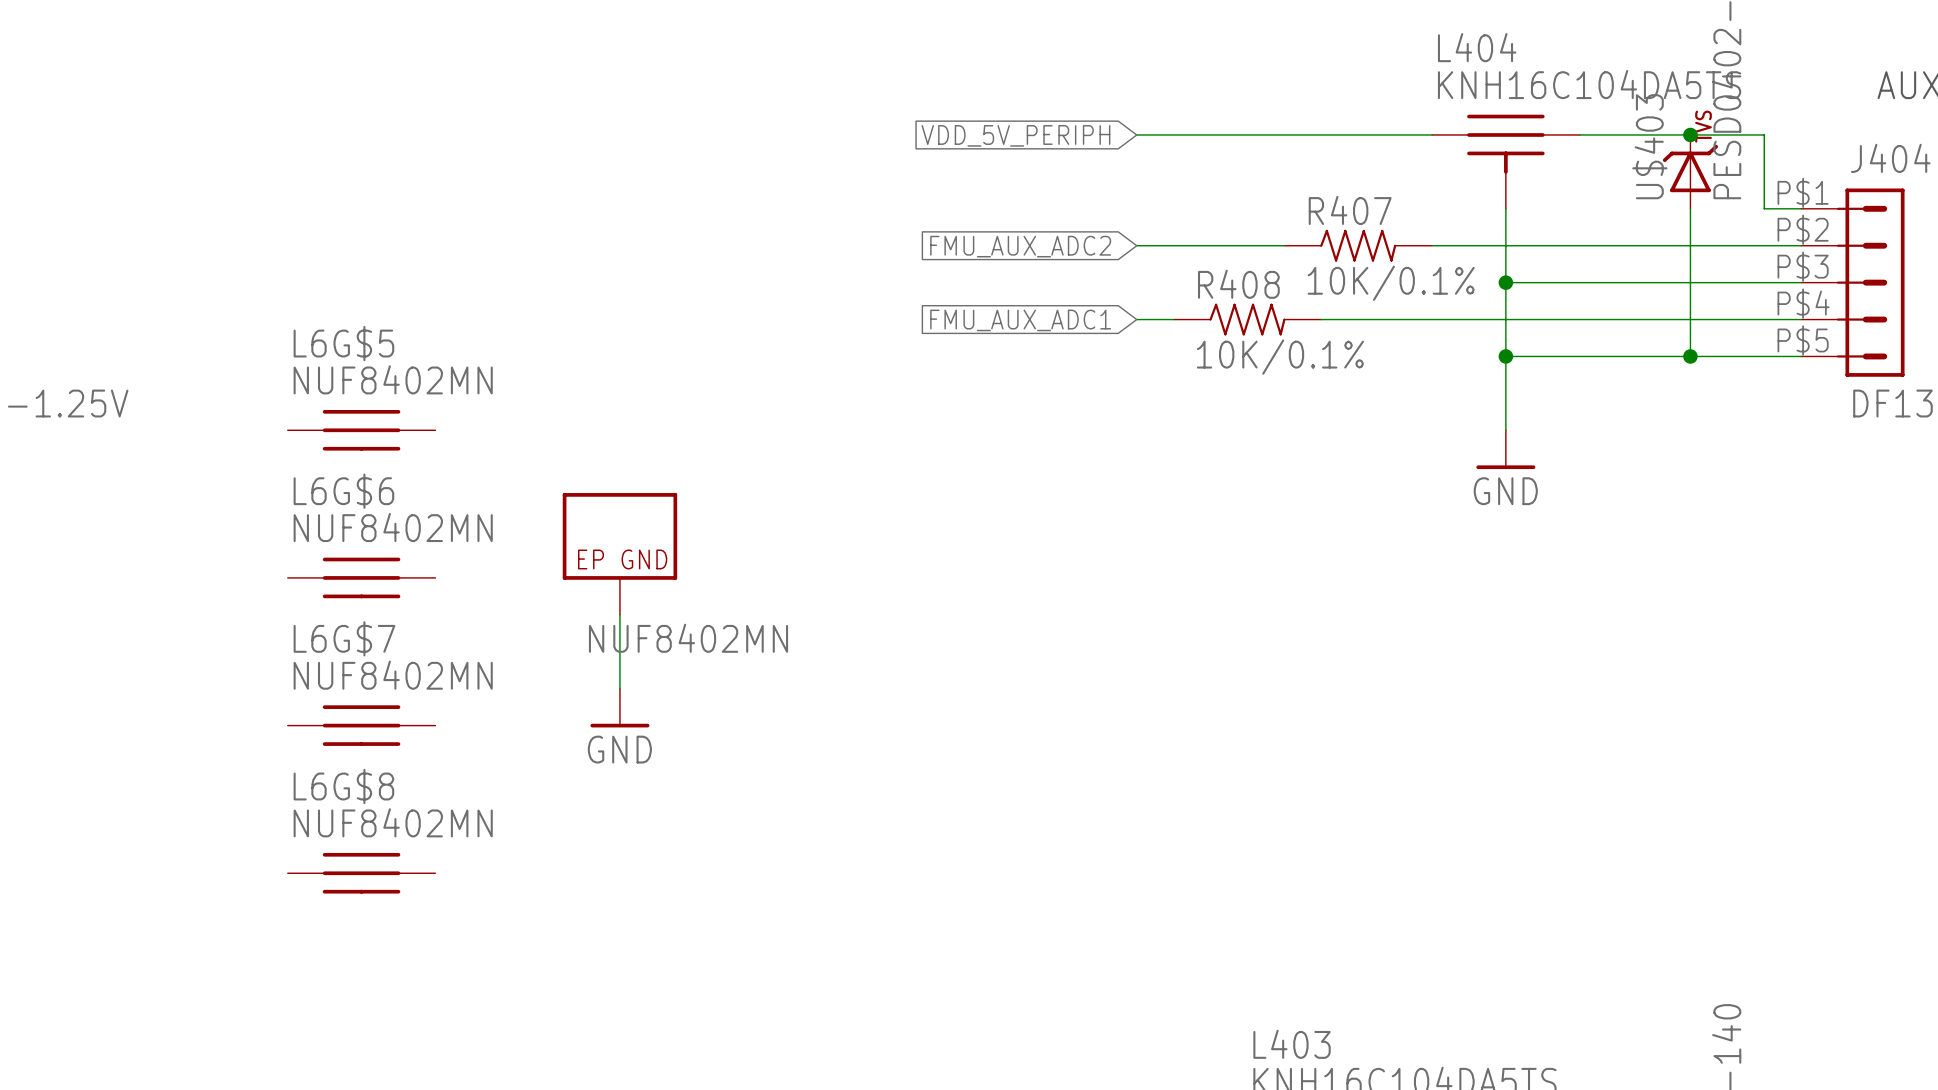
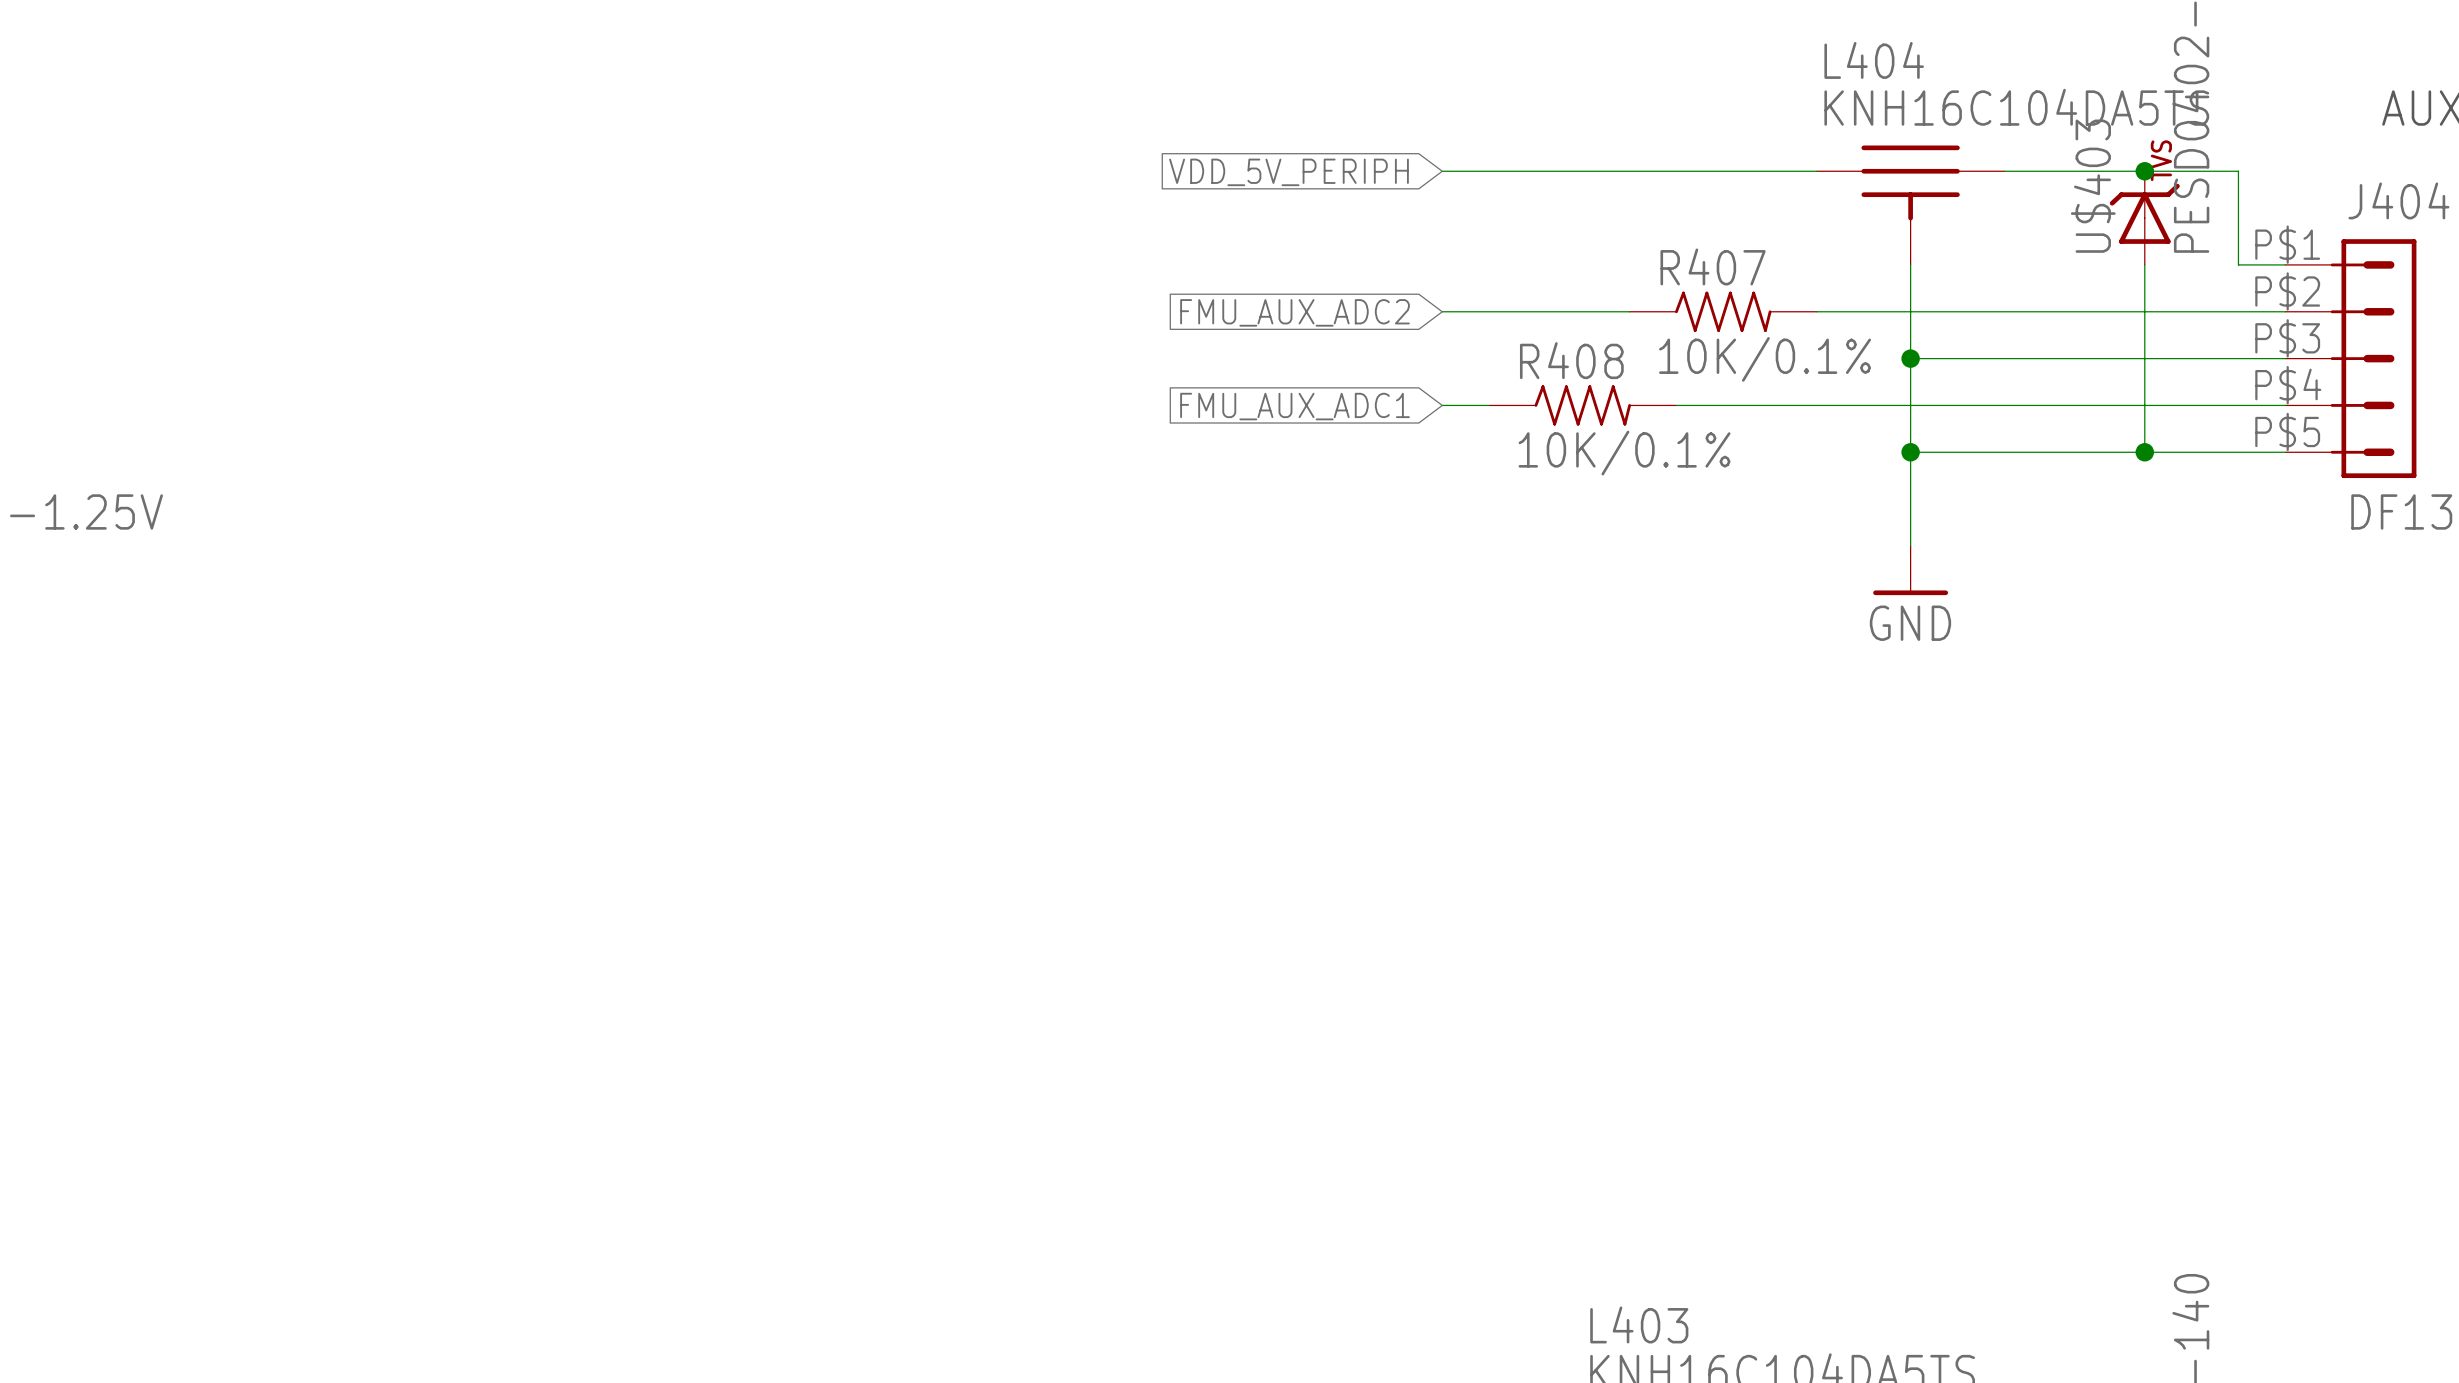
L6G$5: NUF8402MN (361, 430) -> none
part: NUF8402MN (619, 553) -> none
L6G$6: NUF8402MN (361, 577) -> none
wire: (619, 614) (619, 688) -> none
power symbol: GND (619, 708) -> none
L6G$7: NUF8402MN (361, 725) -> none
L6G$8: NUF8402MN (361, 873) -> none

